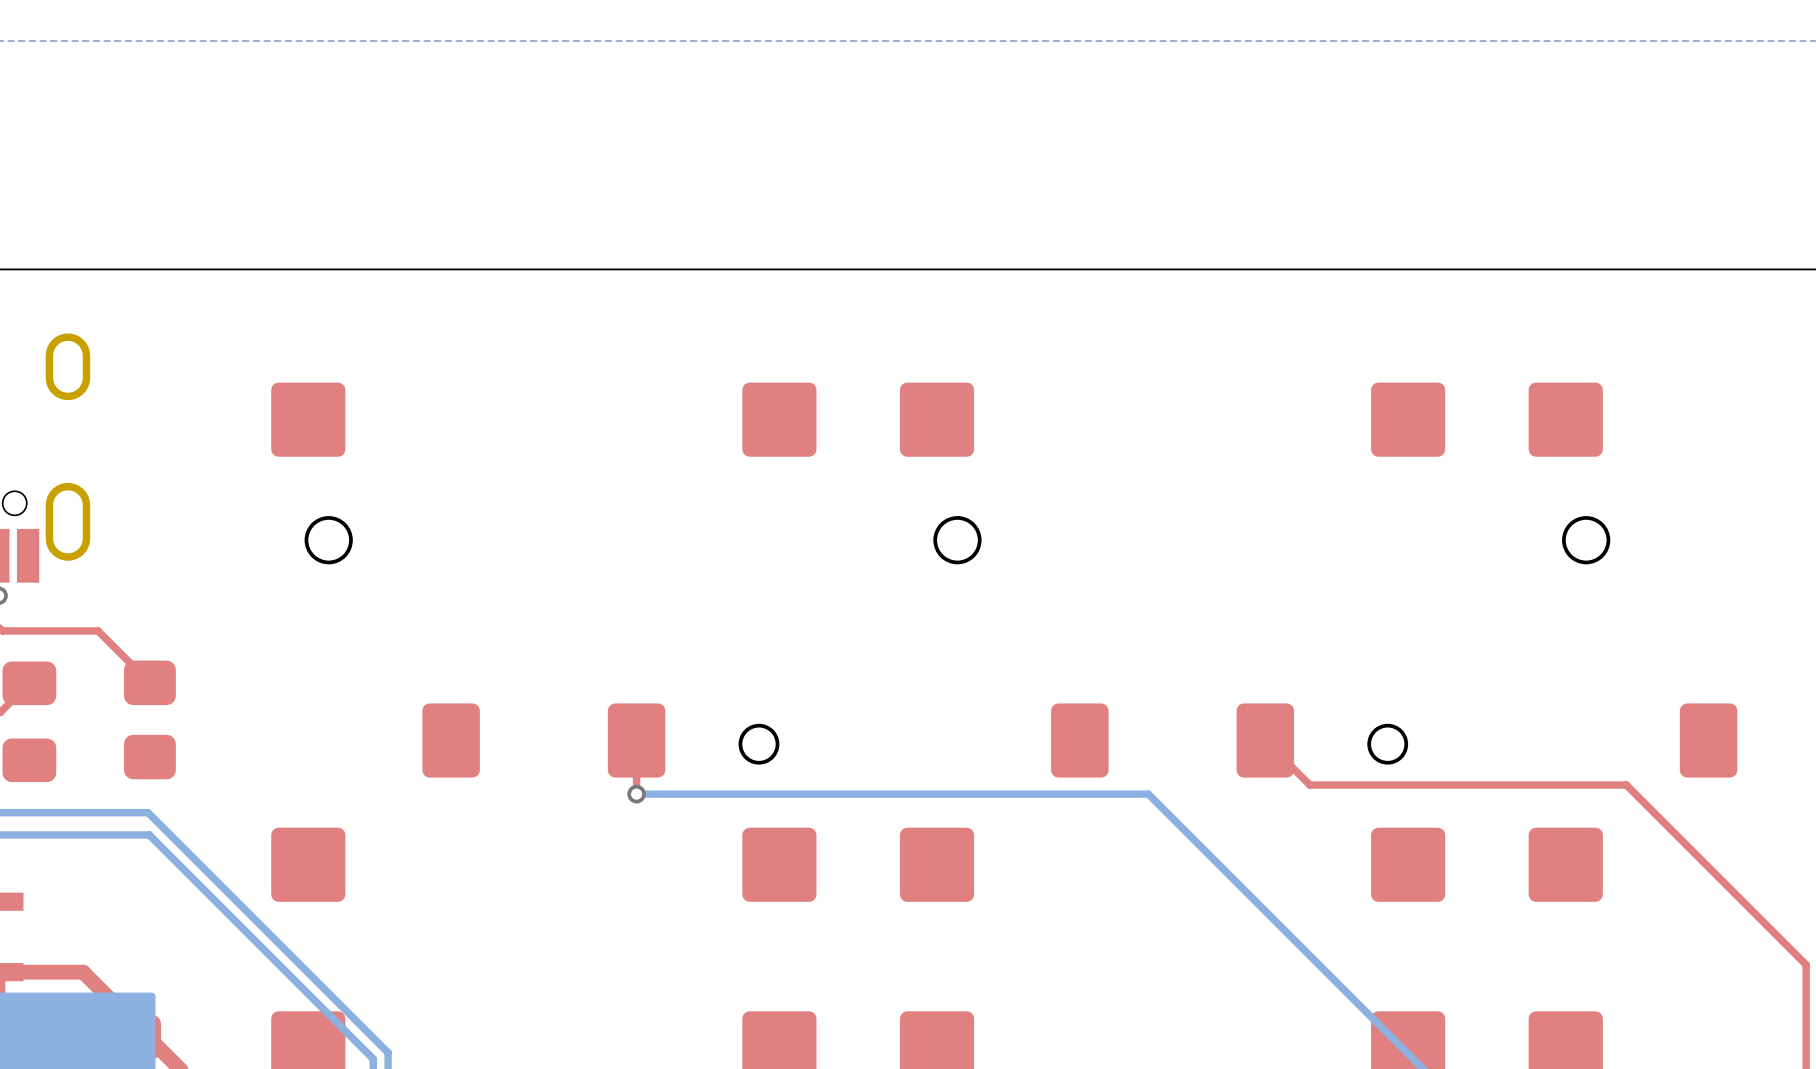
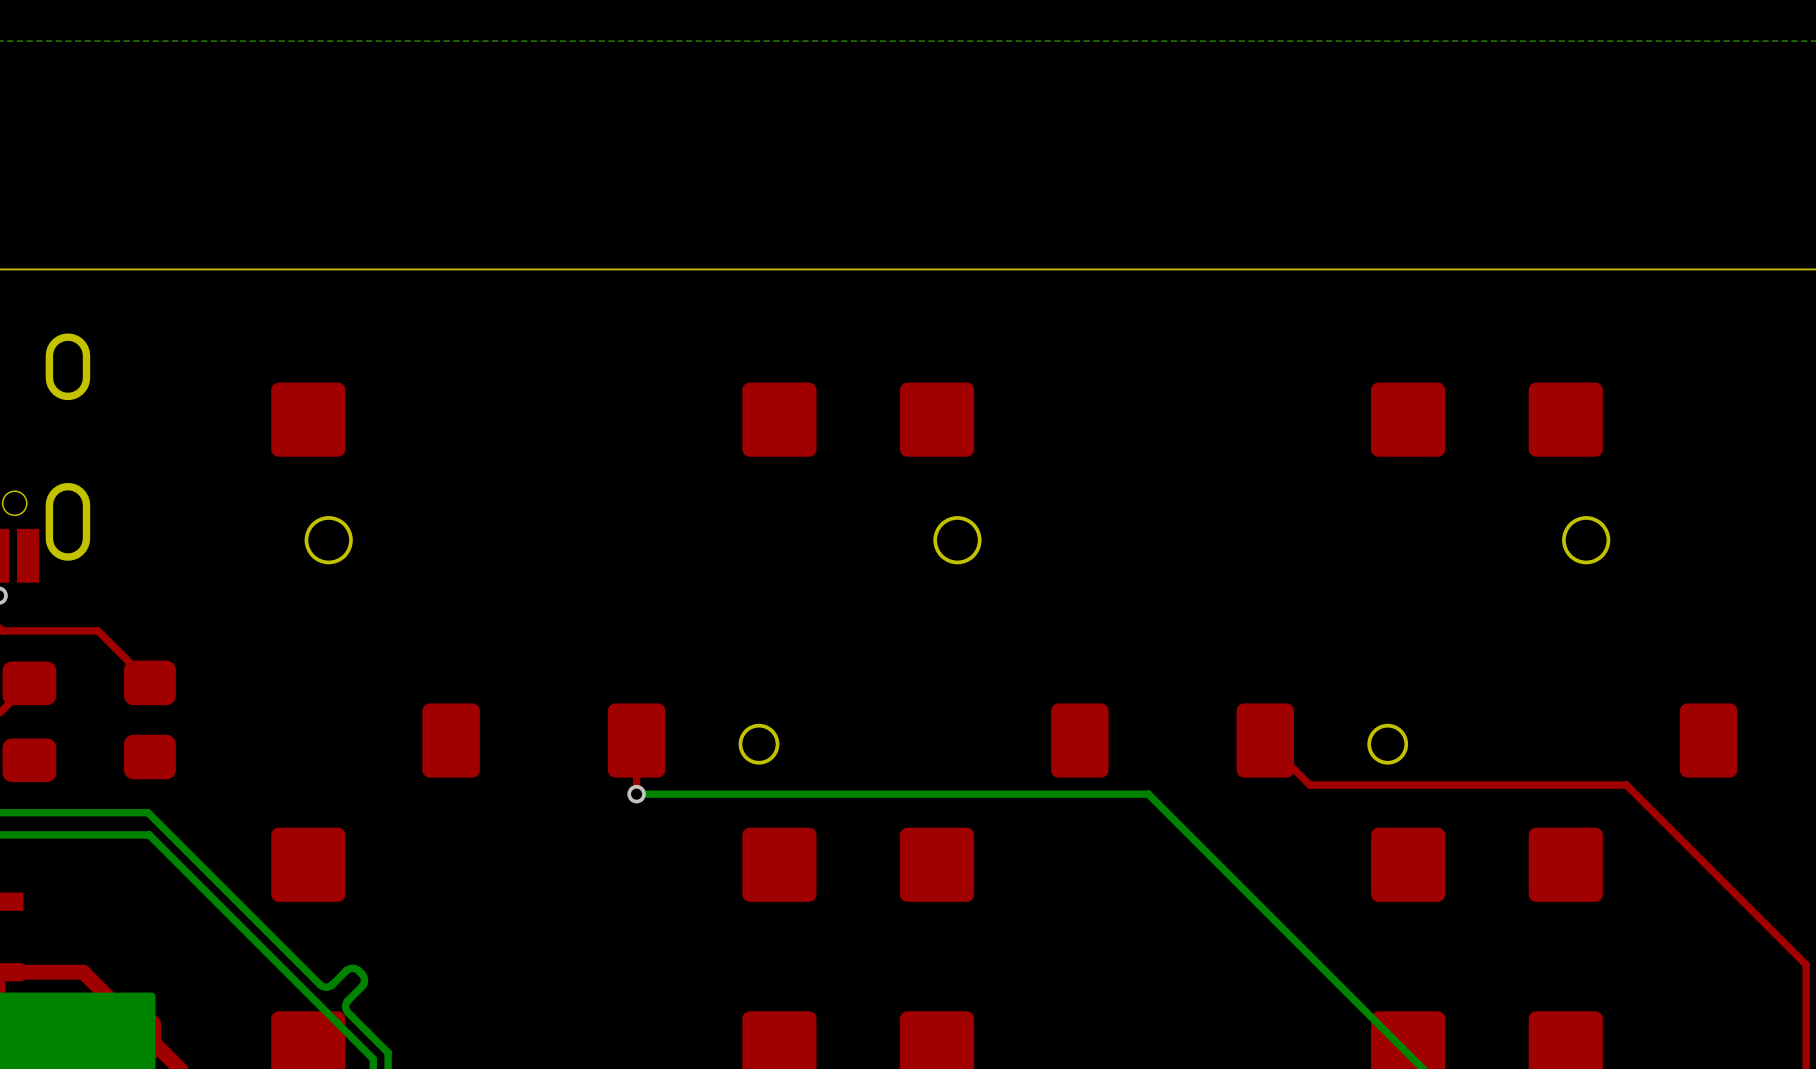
bottom track: (319, 984) (348, 1012) -> (319, 984) (325, 987) (330, 986) (350, 968) (356, 969) (361, 974) (364, 983) (346, 1002) (345, 1007) (348, 1012)

